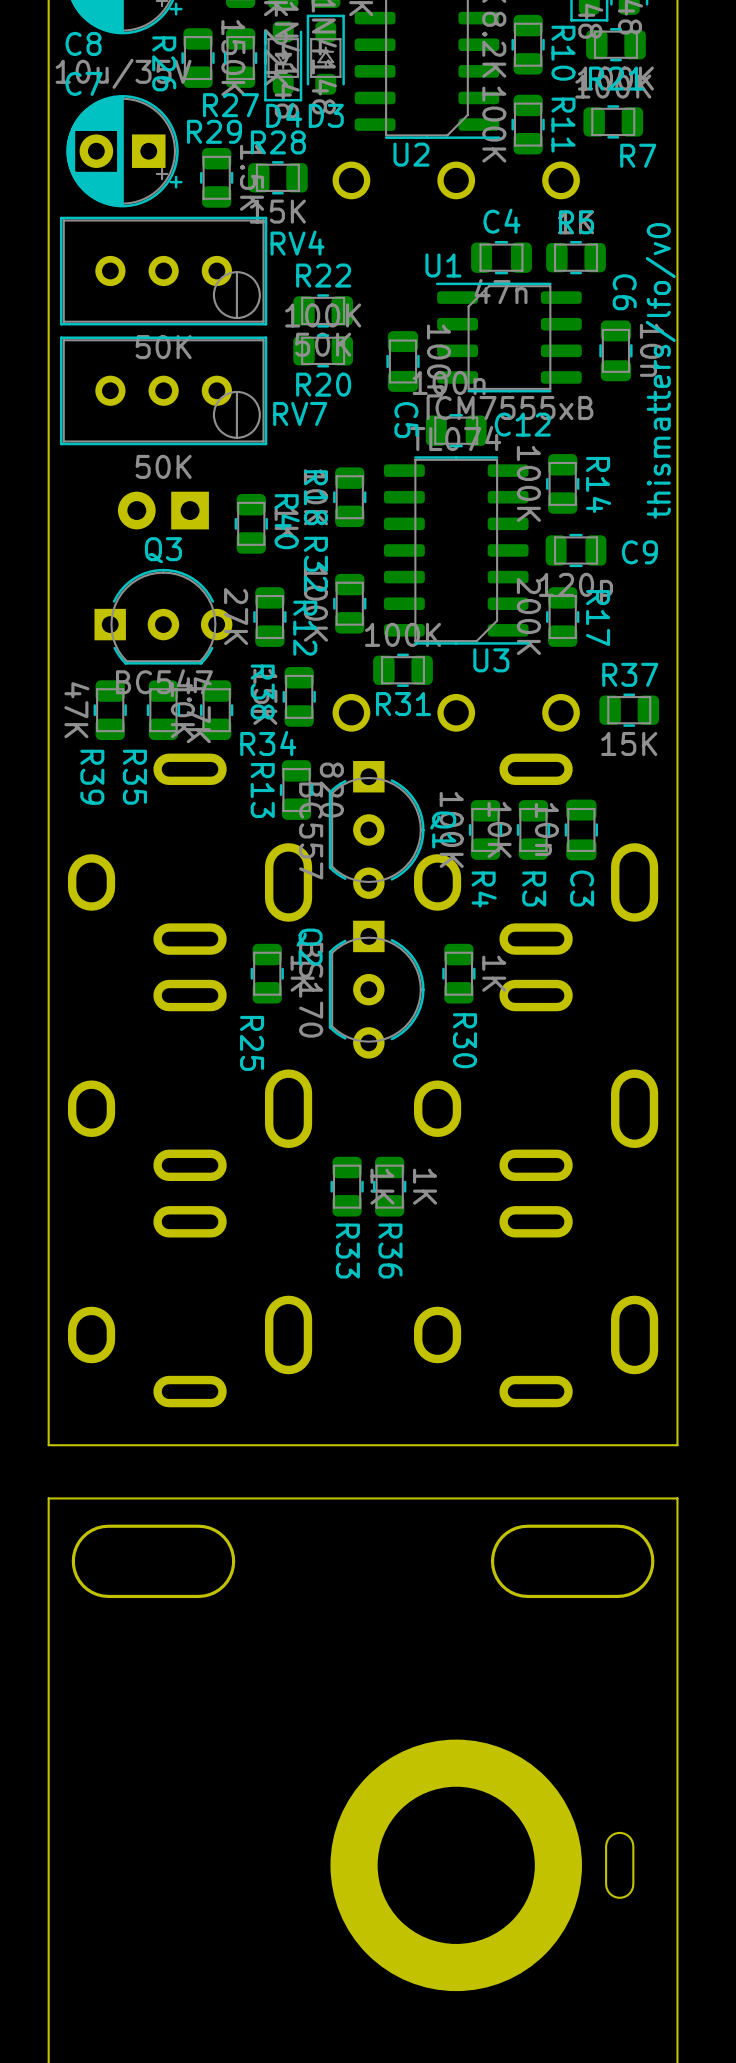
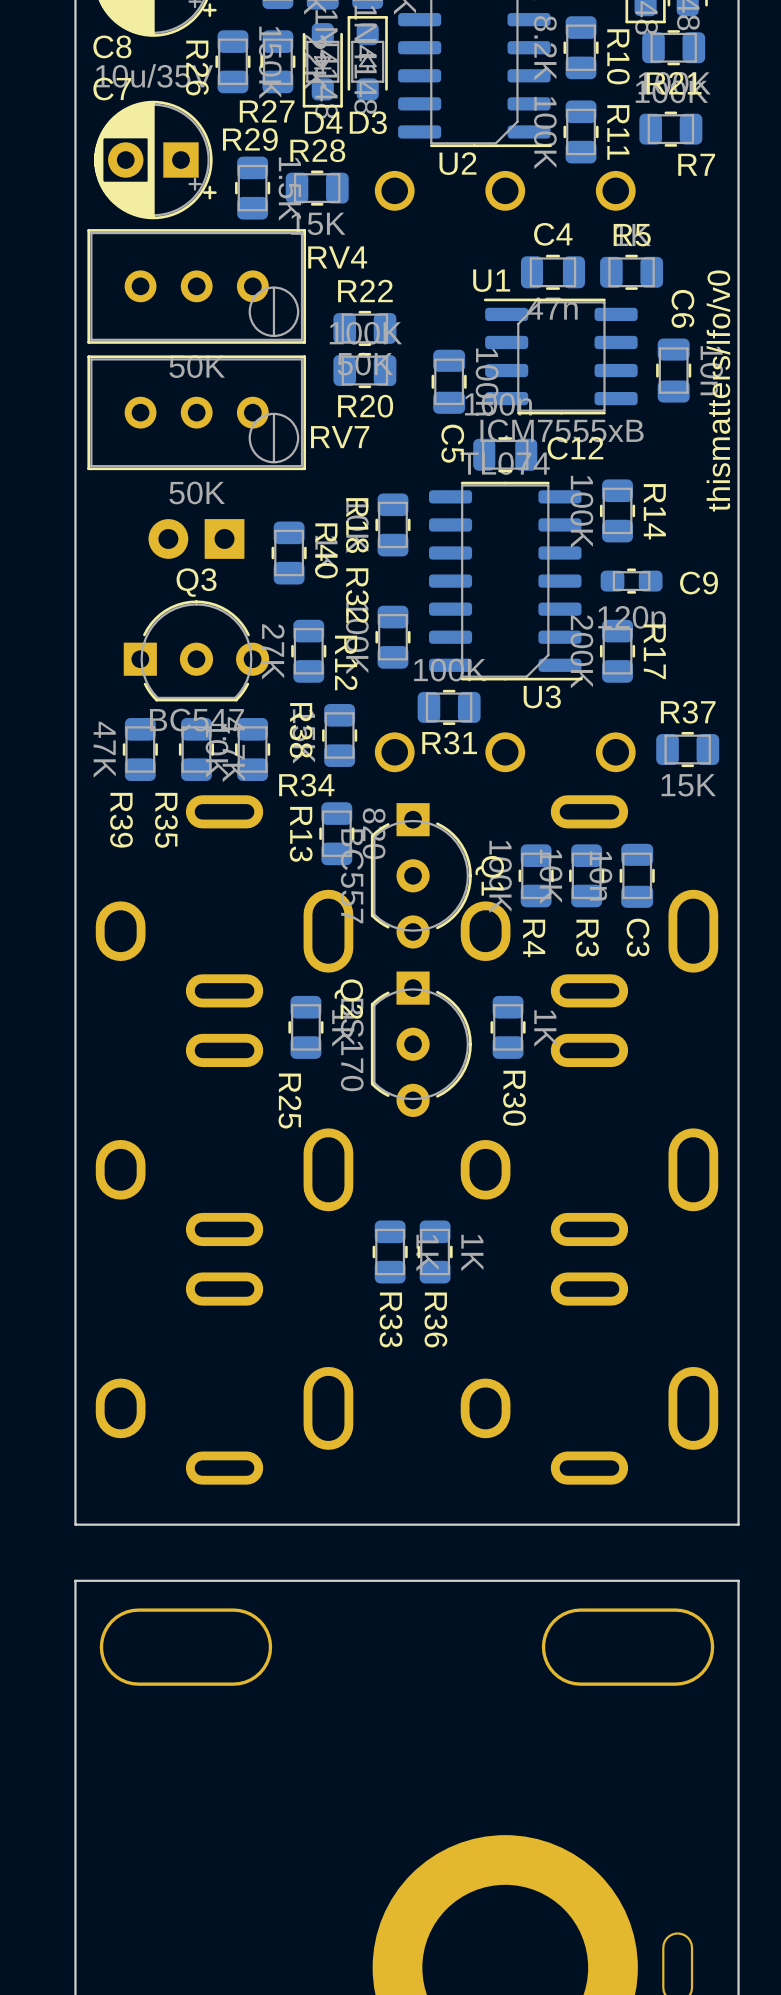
C9 footprint: [545, 533, 607, 568] -> [600, 568, 663, 594]

